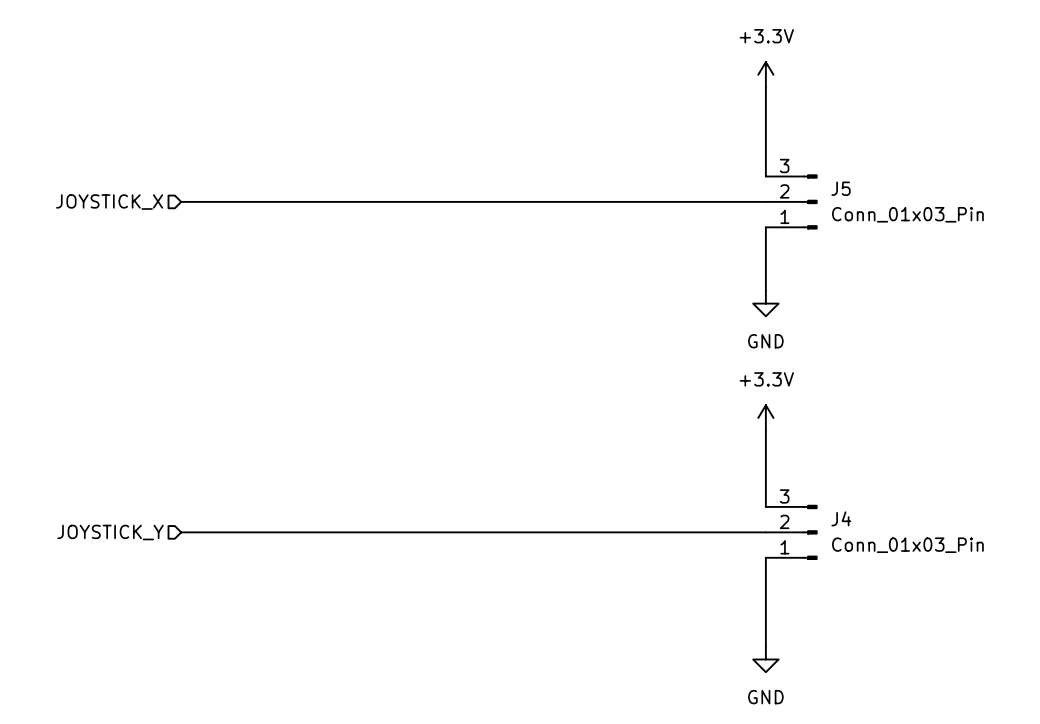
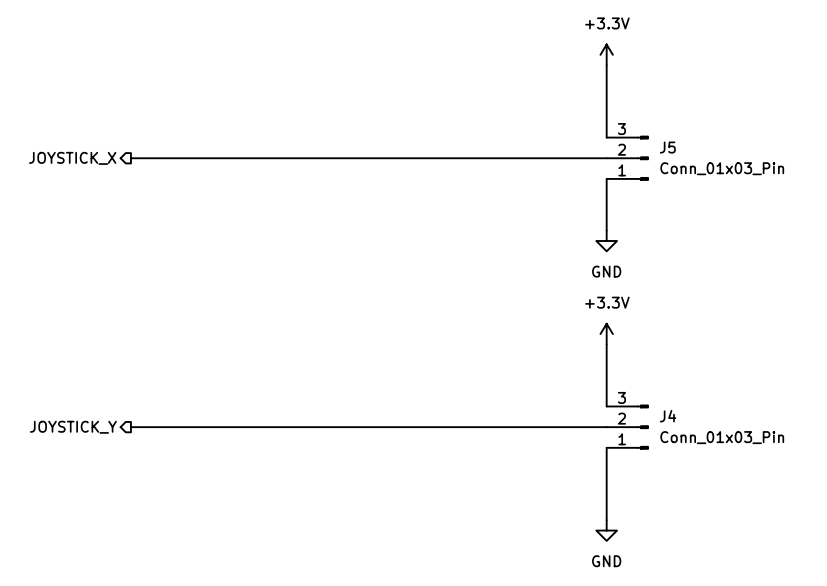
hierarchical label shape: input (109, 202) -> output (72, 158)
hierarchical label shape: input (110, 532) -> output (73, 427)

